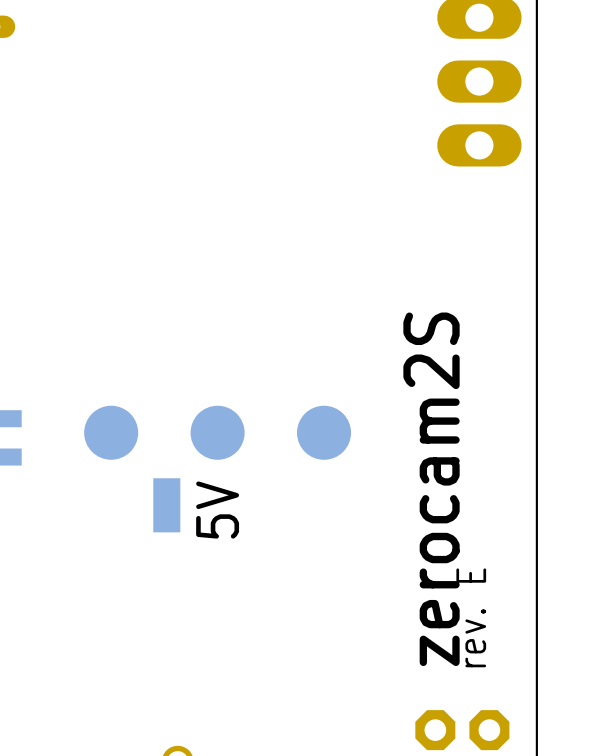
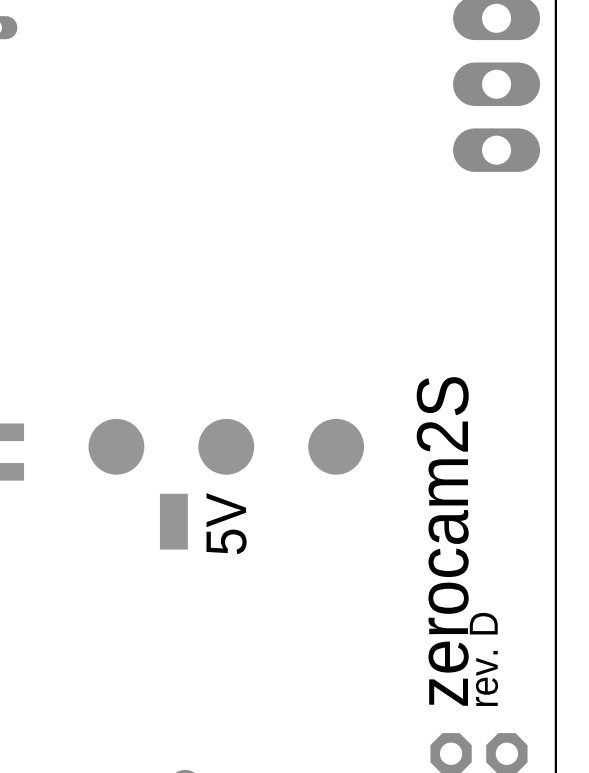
text position: zerocam2S (431, 489) -> zerocam2S (442, 541)
text: rev. E (471, 617) -> rev. D (483, 659)

